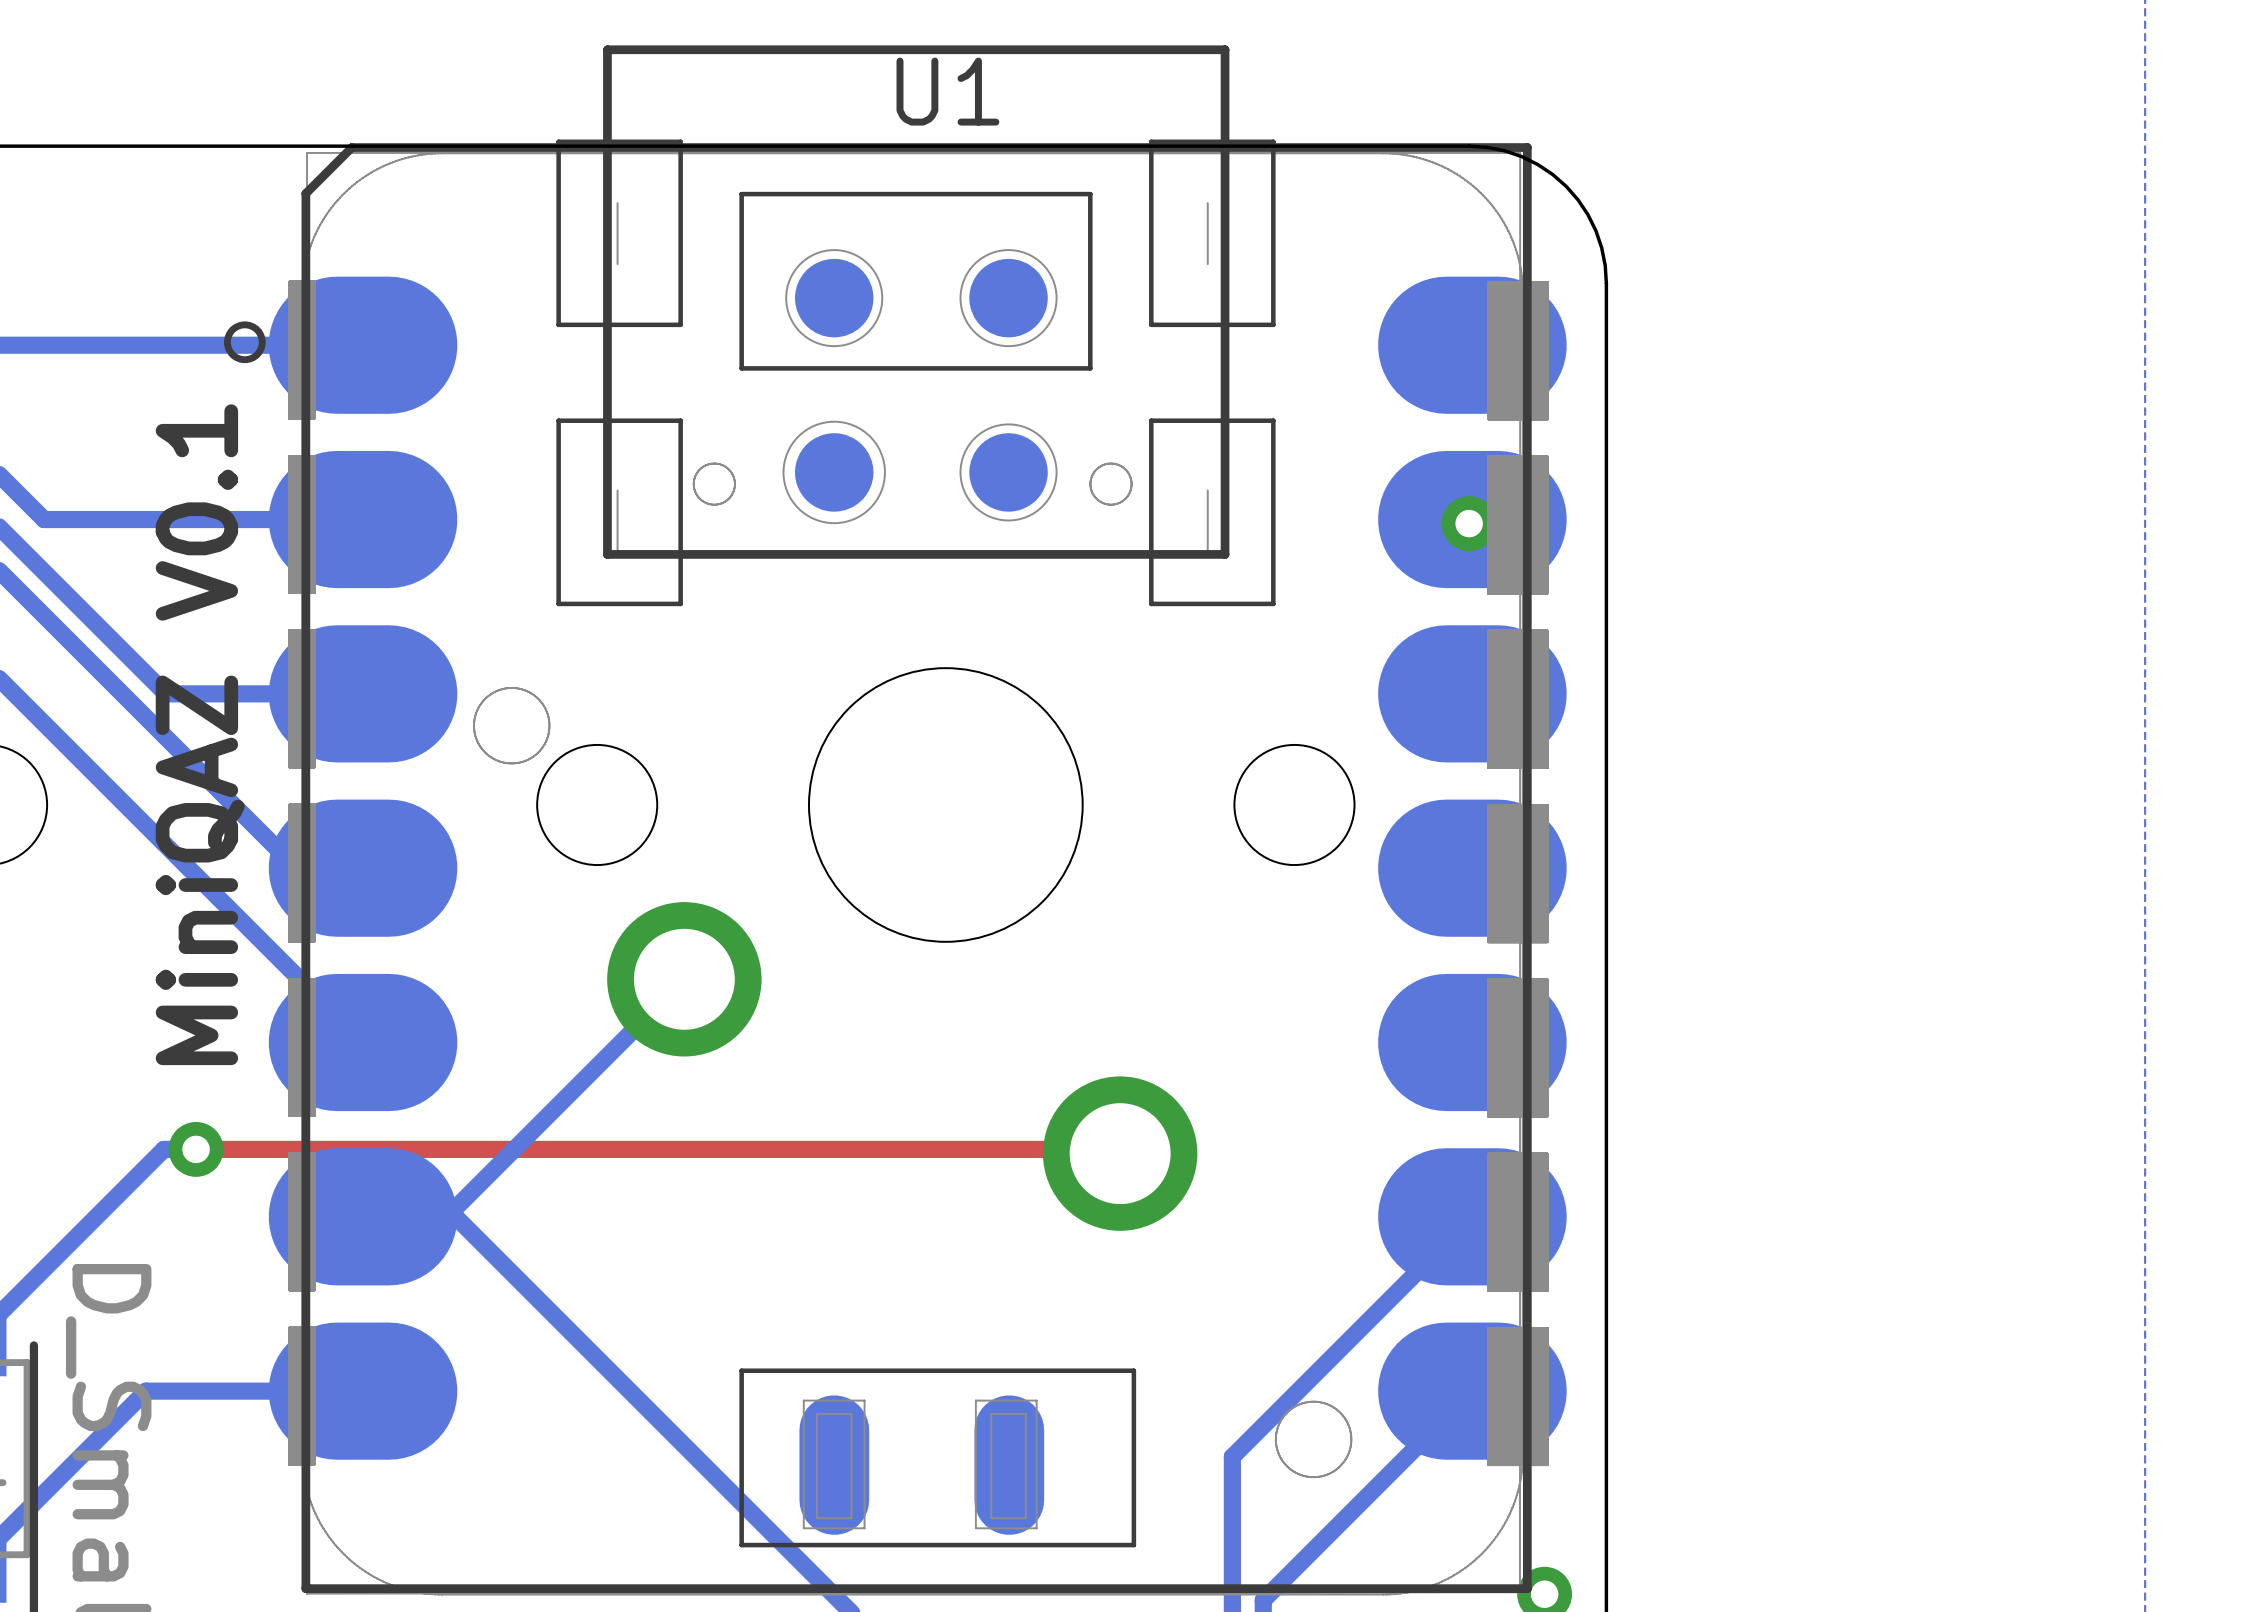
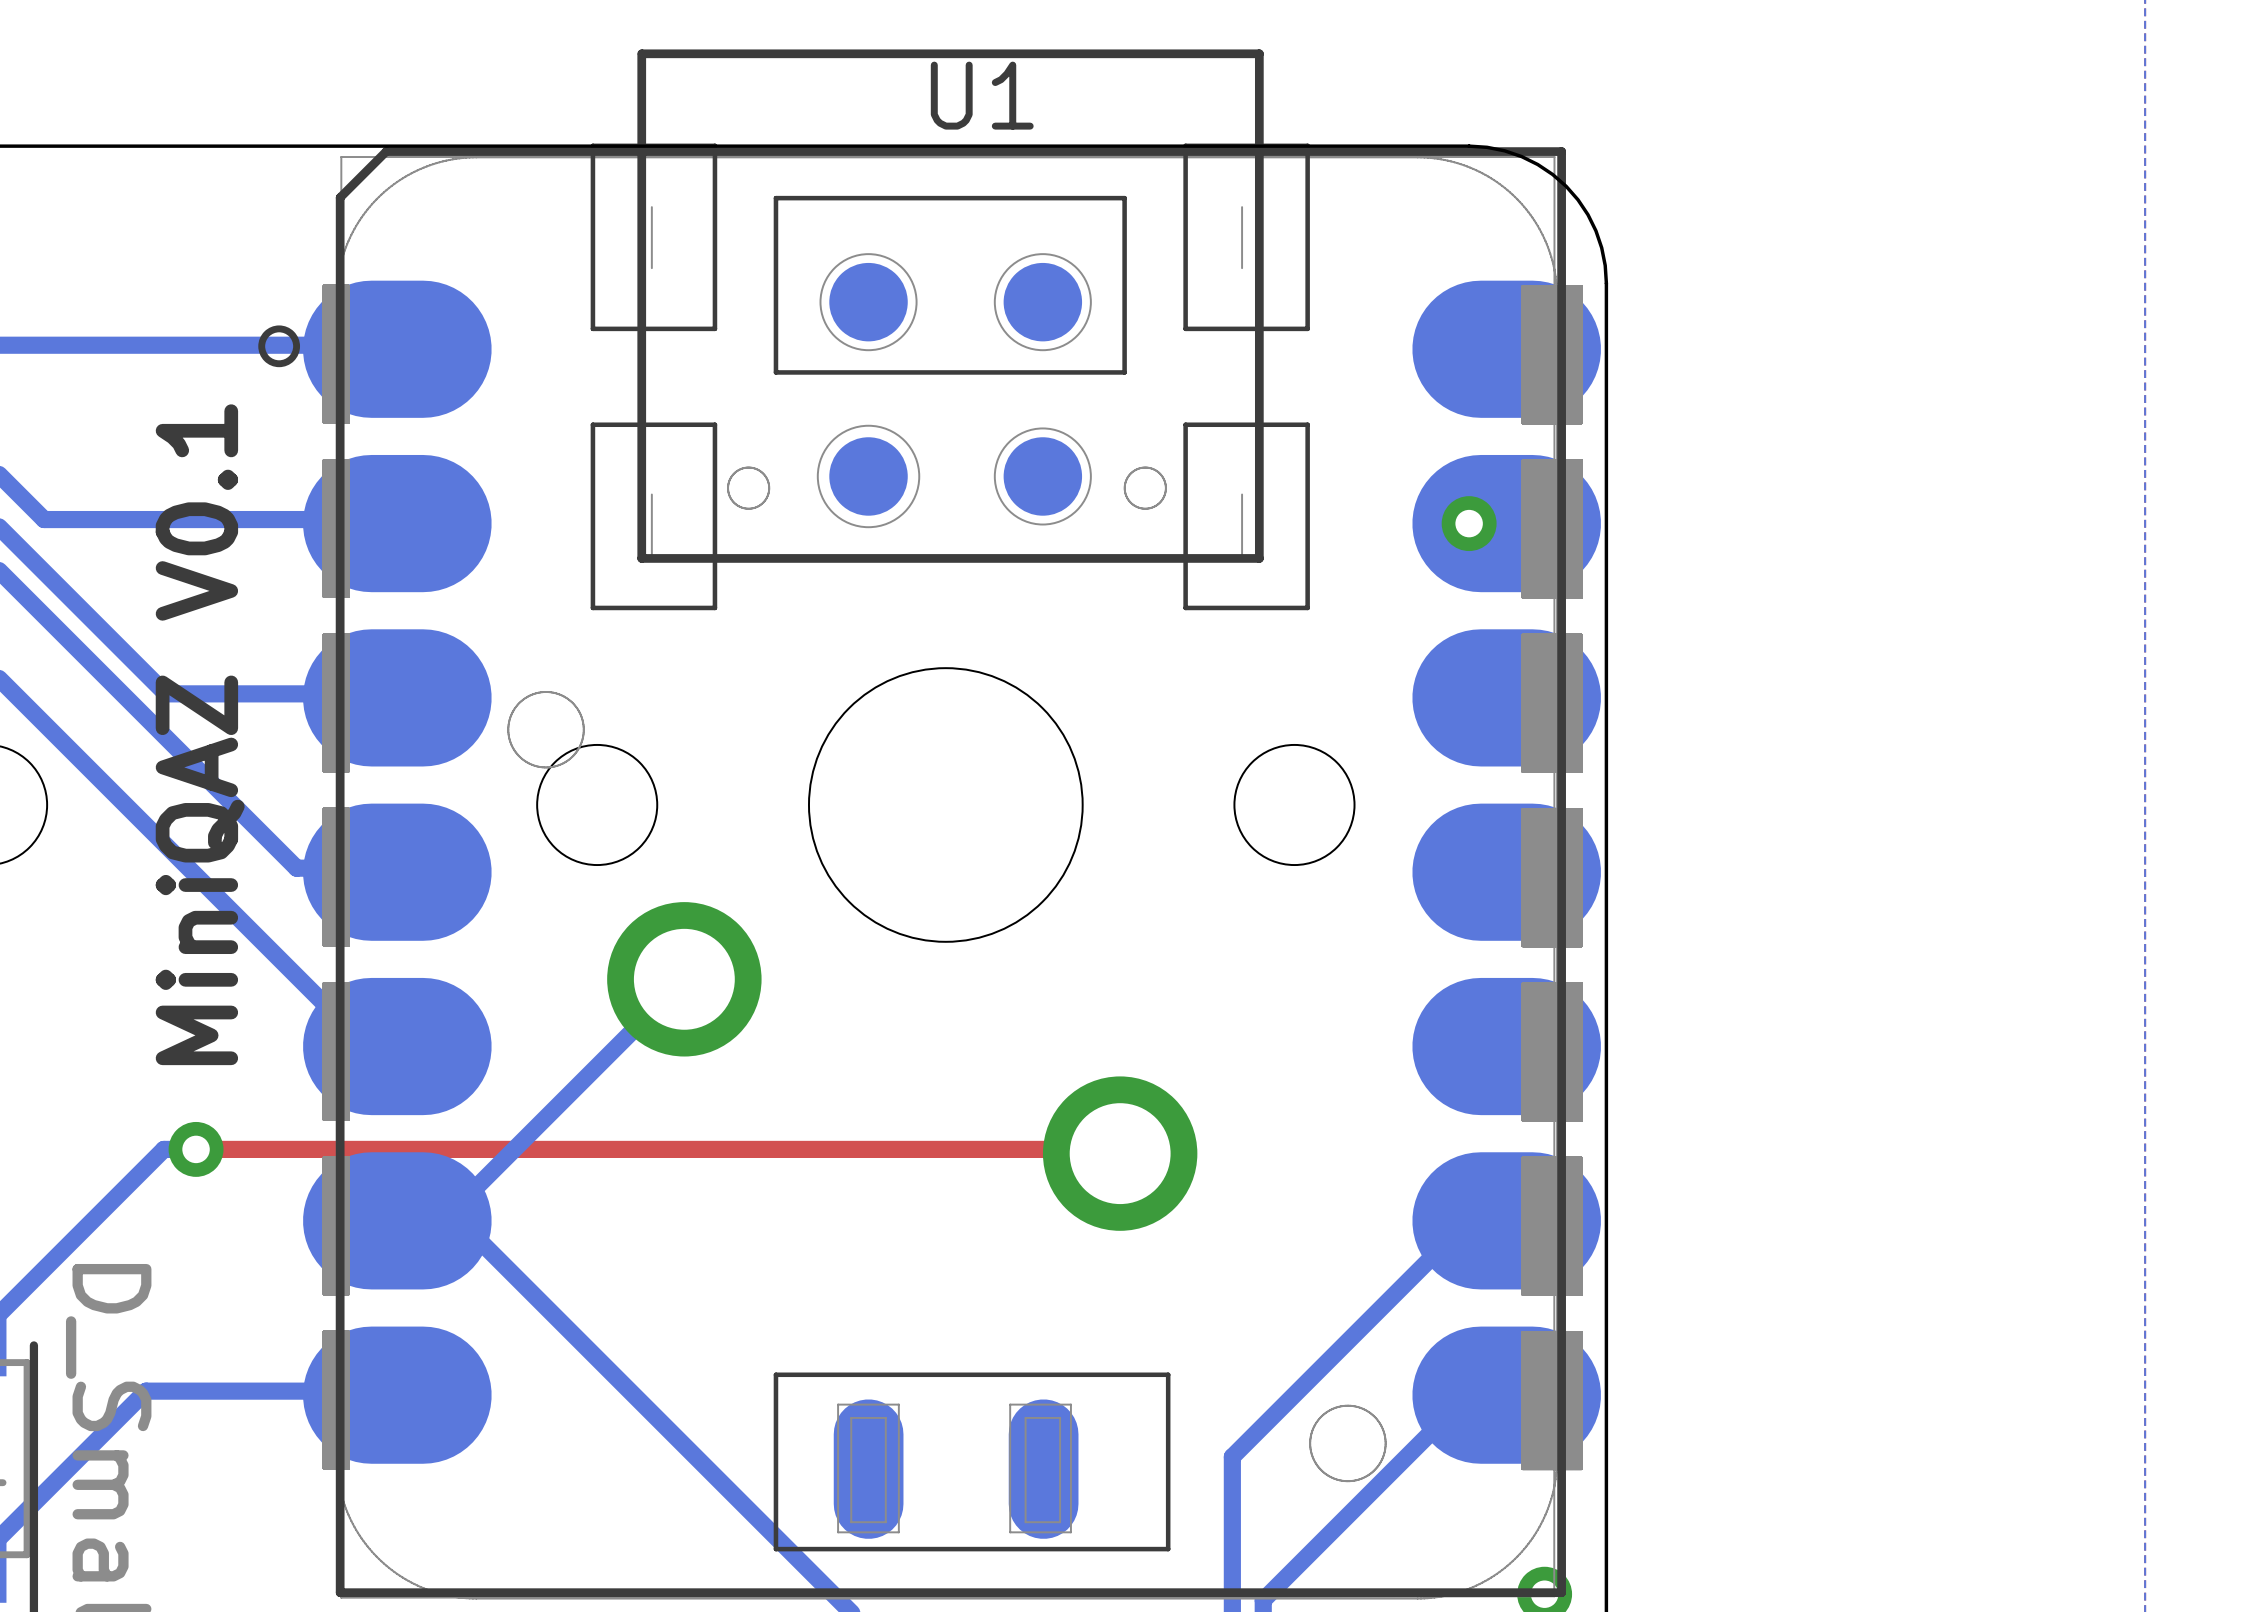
U1 position: (895, 820) -> (929, 824)

